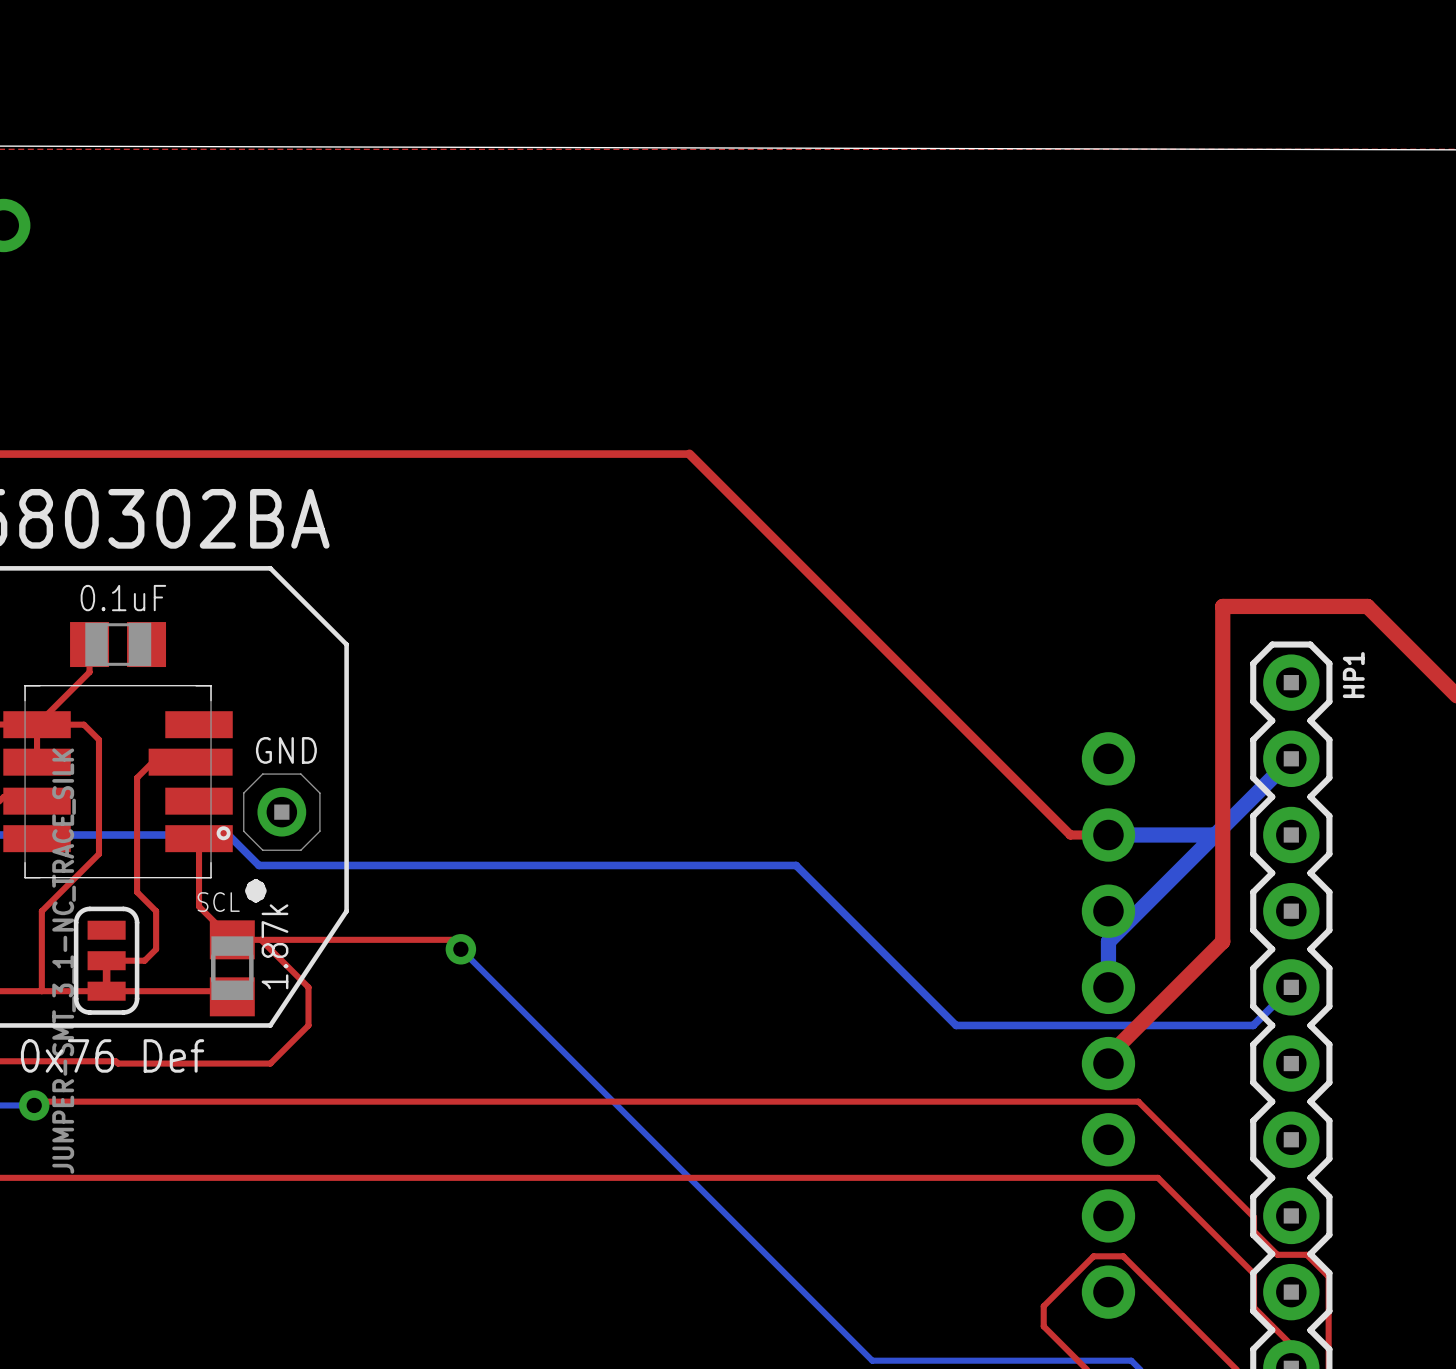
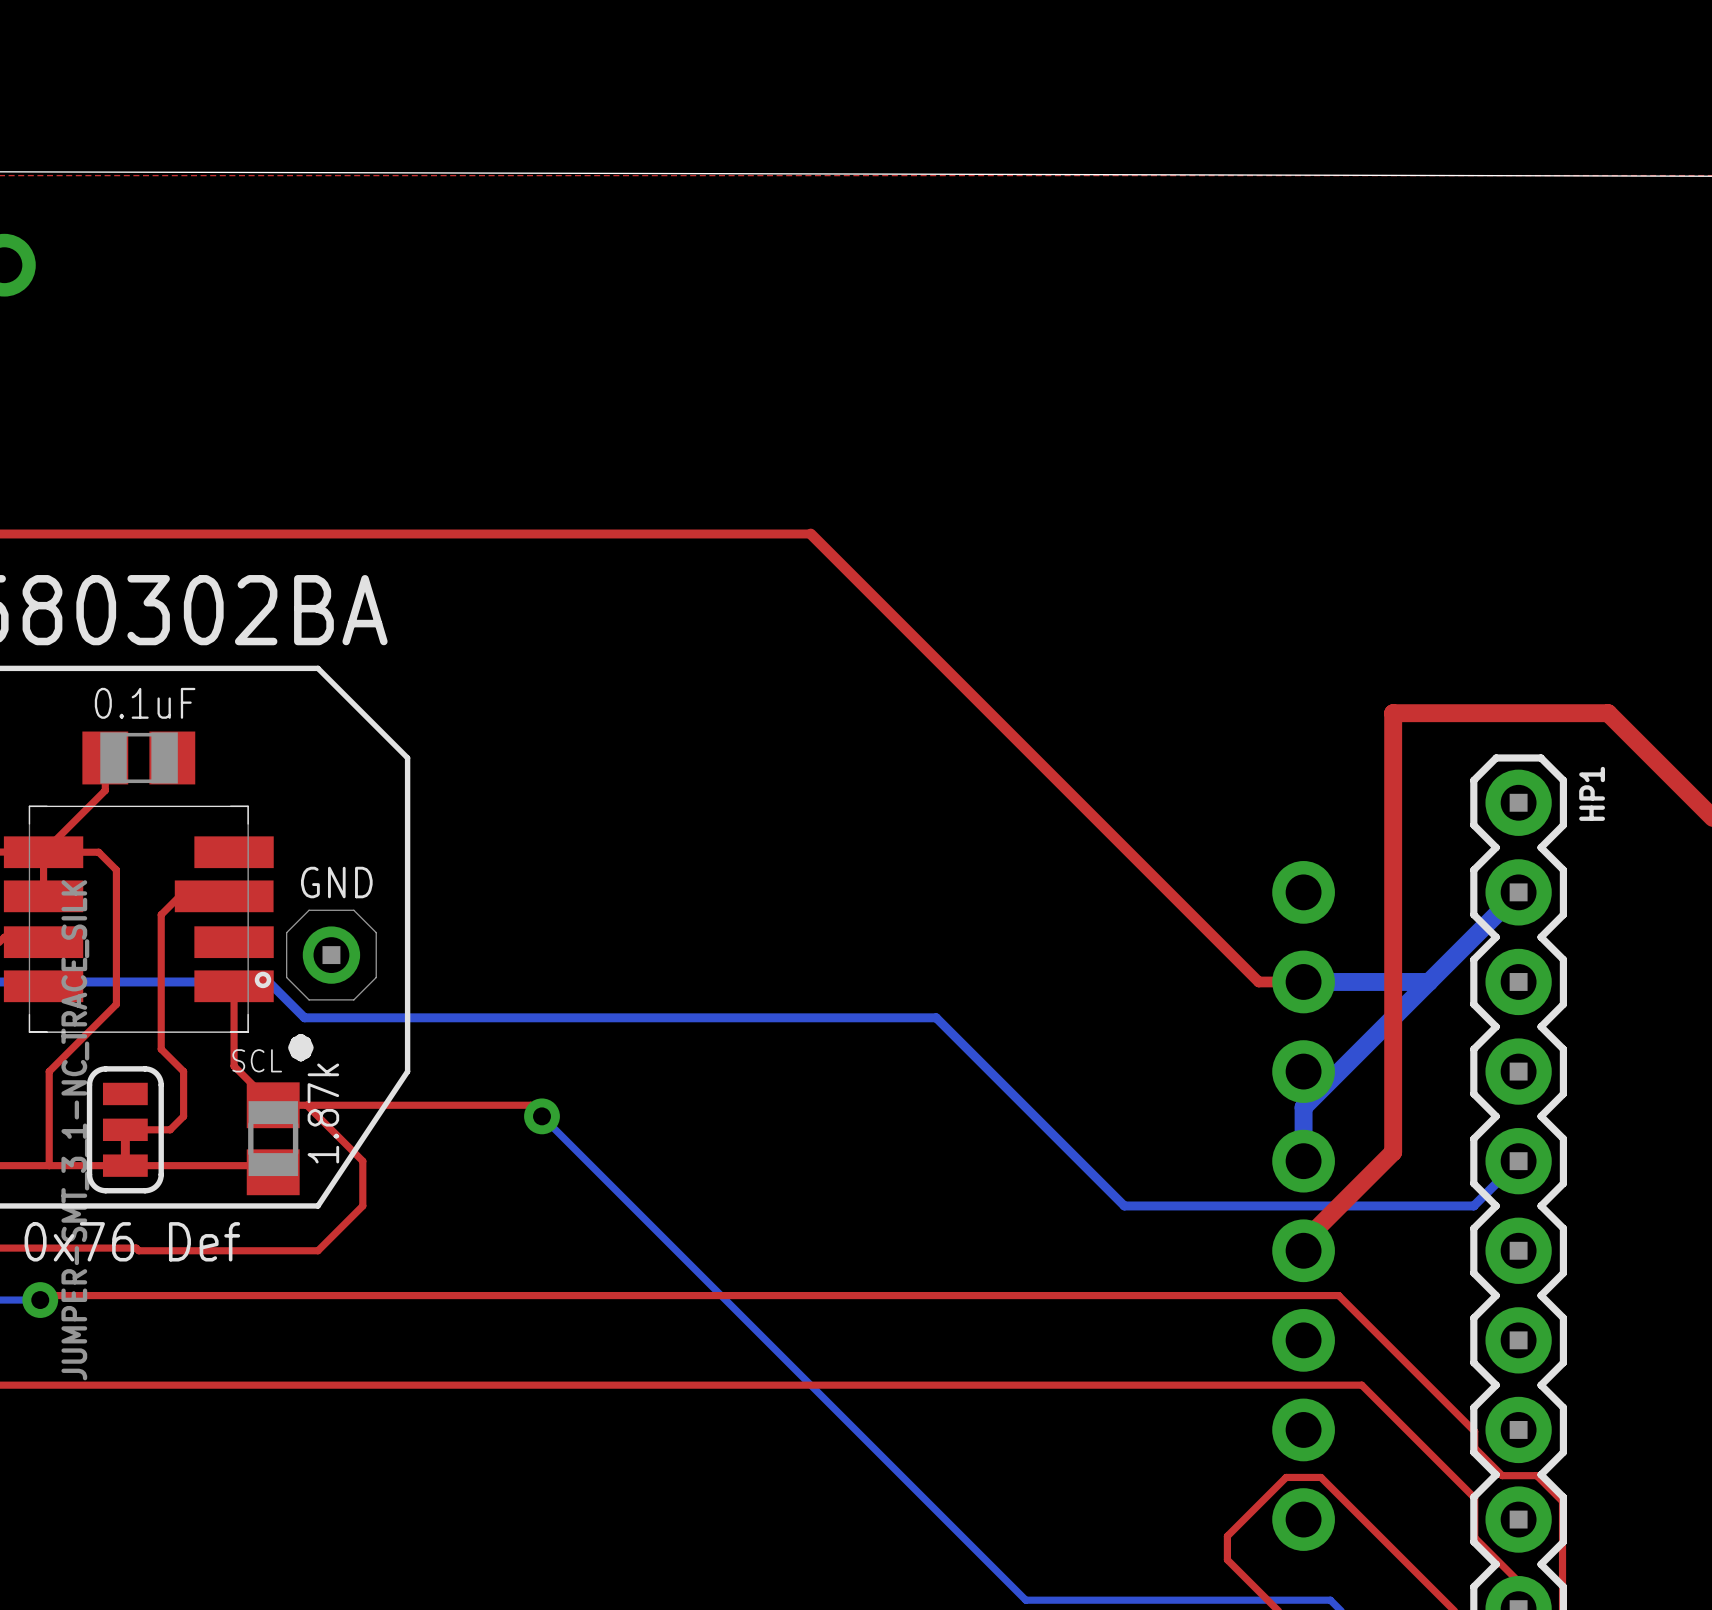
top track: (1222, 606) (1222, 941) (1184, 979) -> (1437, 713) (1393, 713) (1393, 1152)

